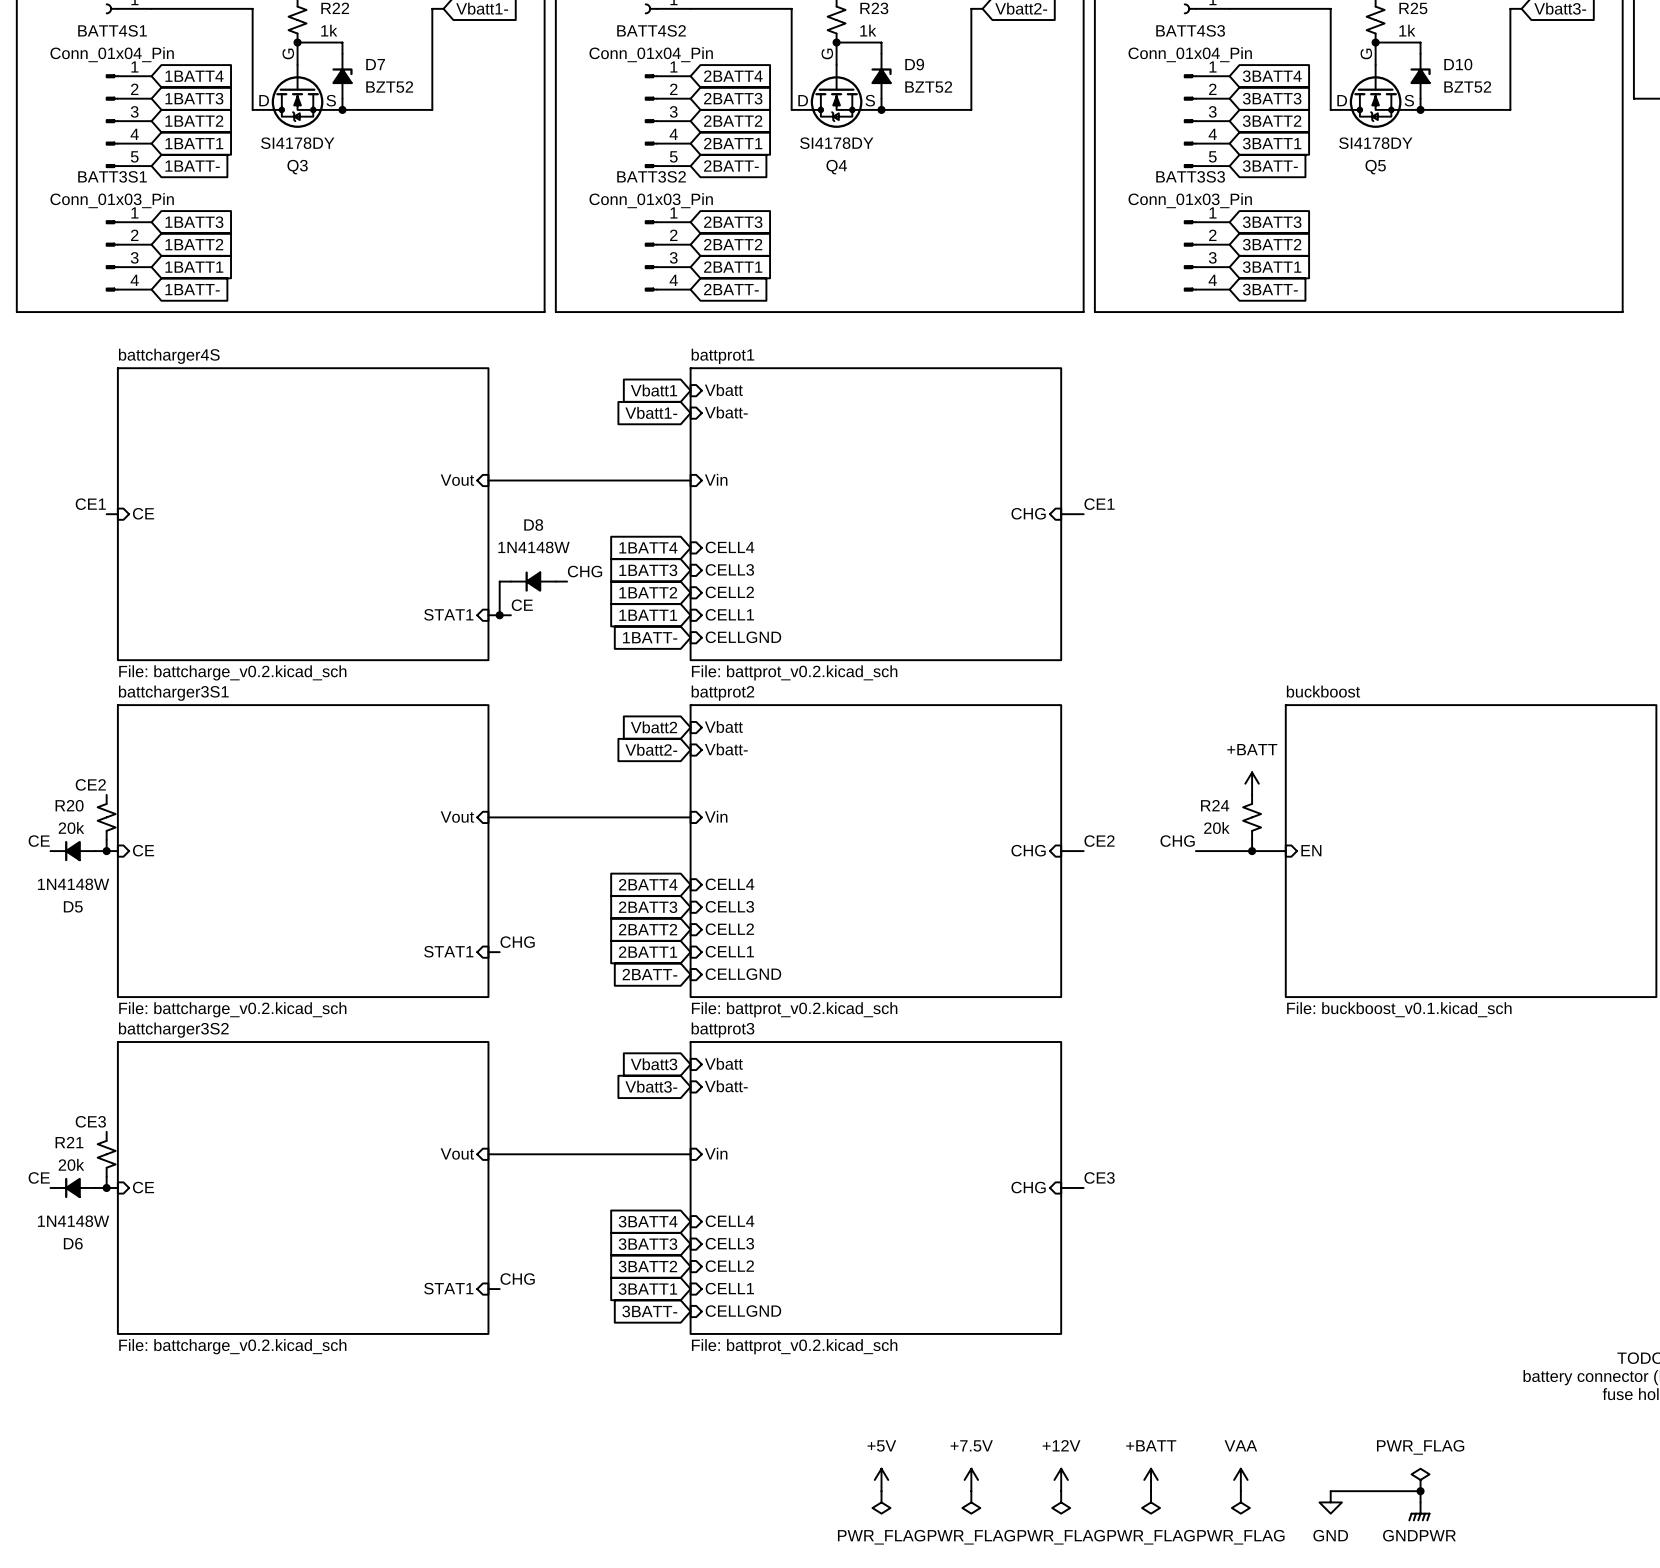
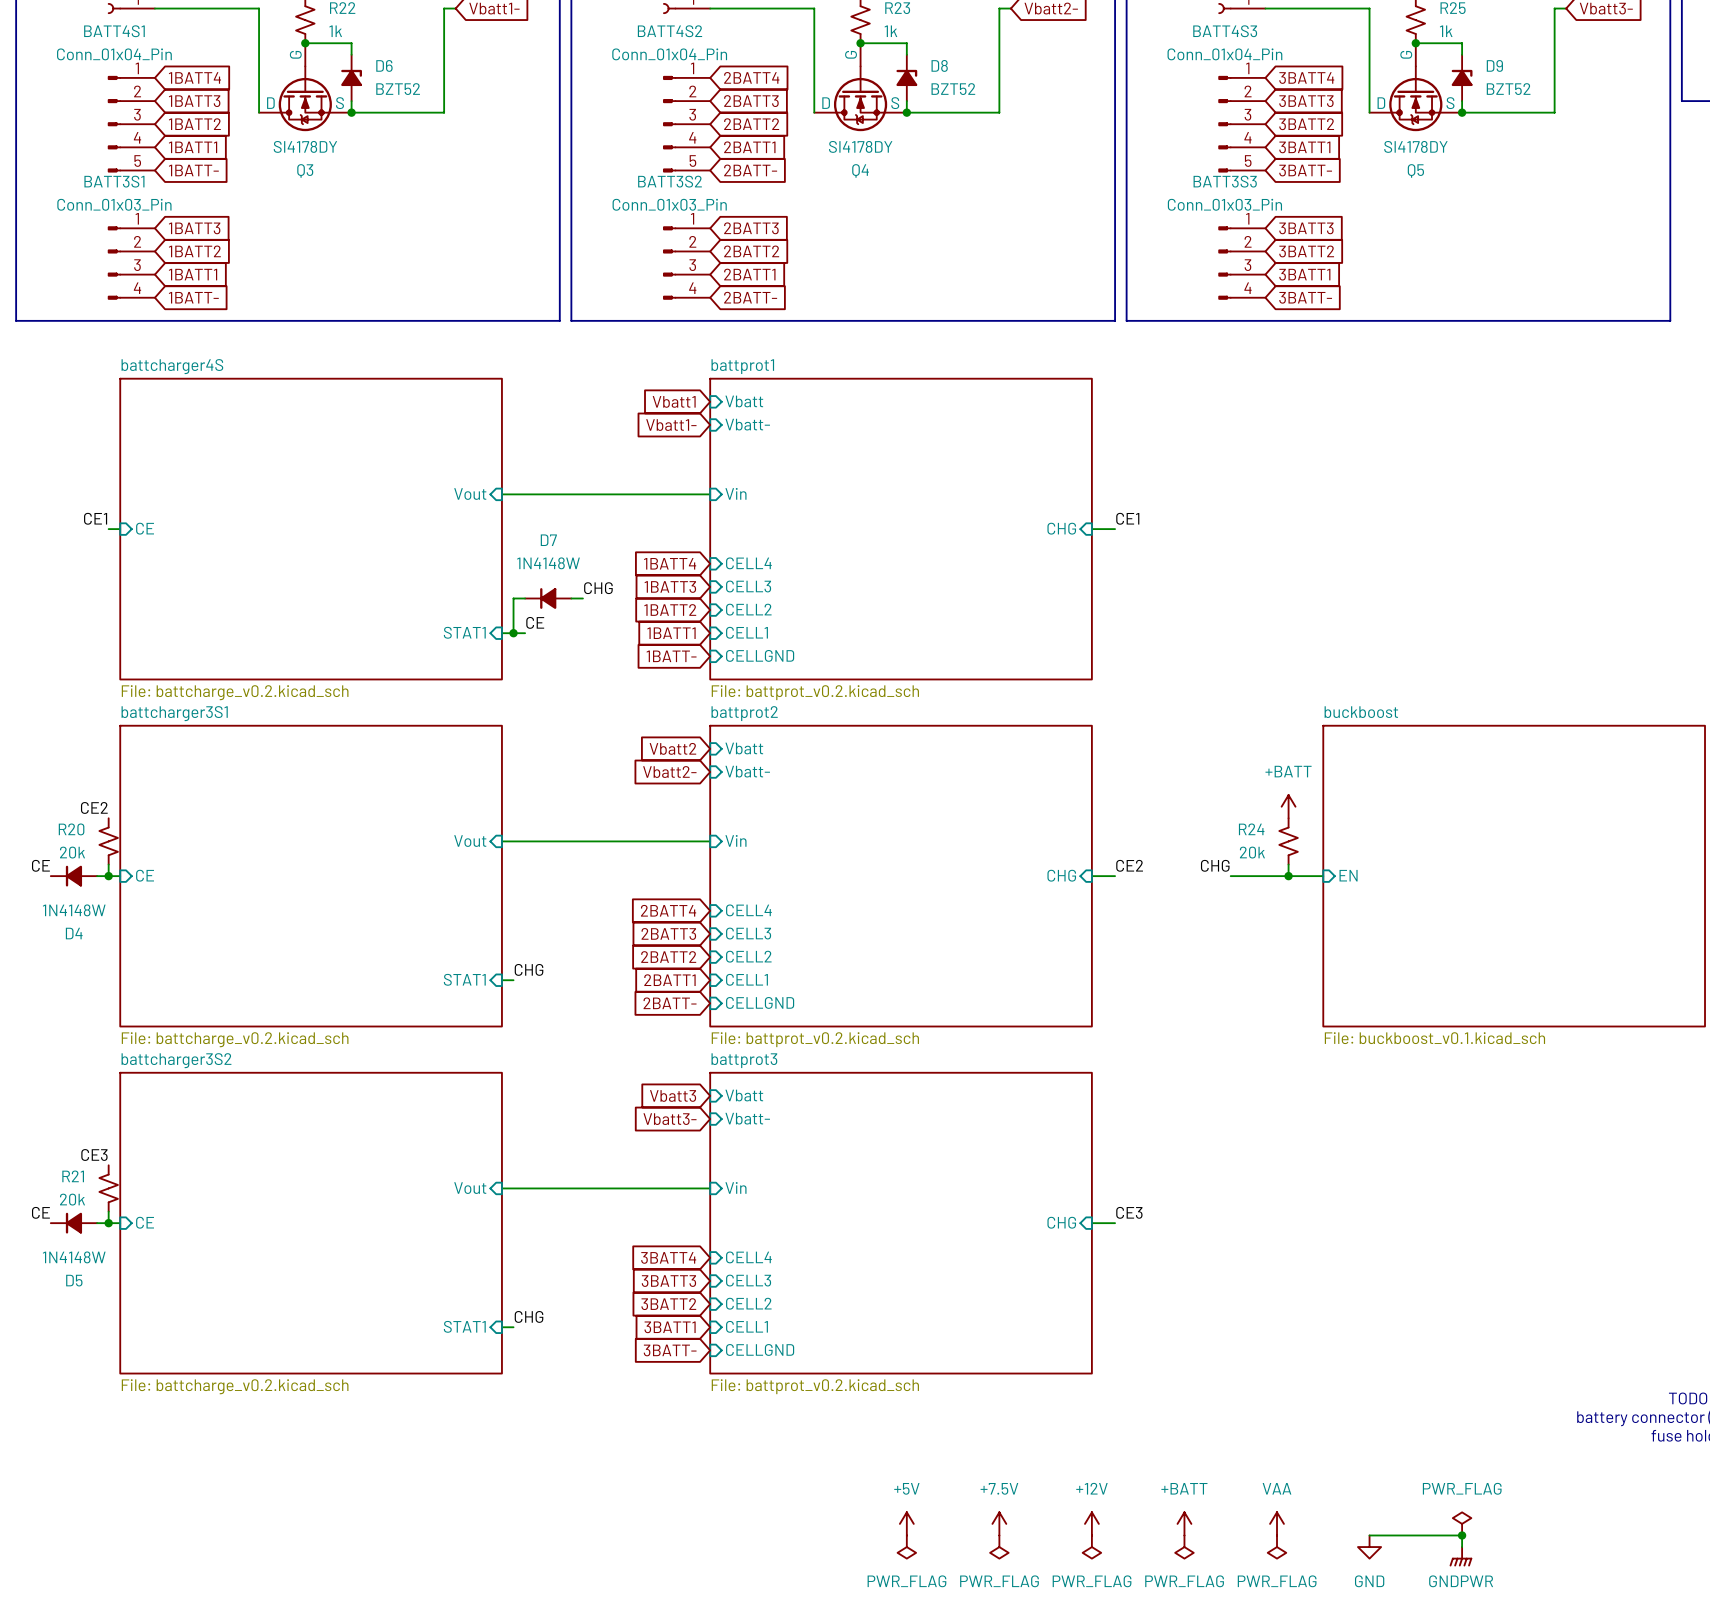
D7 name: D7 (375, 64) -> D6 (384, 65)
D9 name: D9 (914, 64) -> D8 (939, 65)
D10 name: D10 (1458, 64) -> D9 (1494, 65)
D8 name: D8 (533, 525) -> D7 (548, 540)
D5 name: D5 (73, 906) -> D4 (74, 933)
D6 name: D6 (73, 1243) -> D5 (74, 1280)

